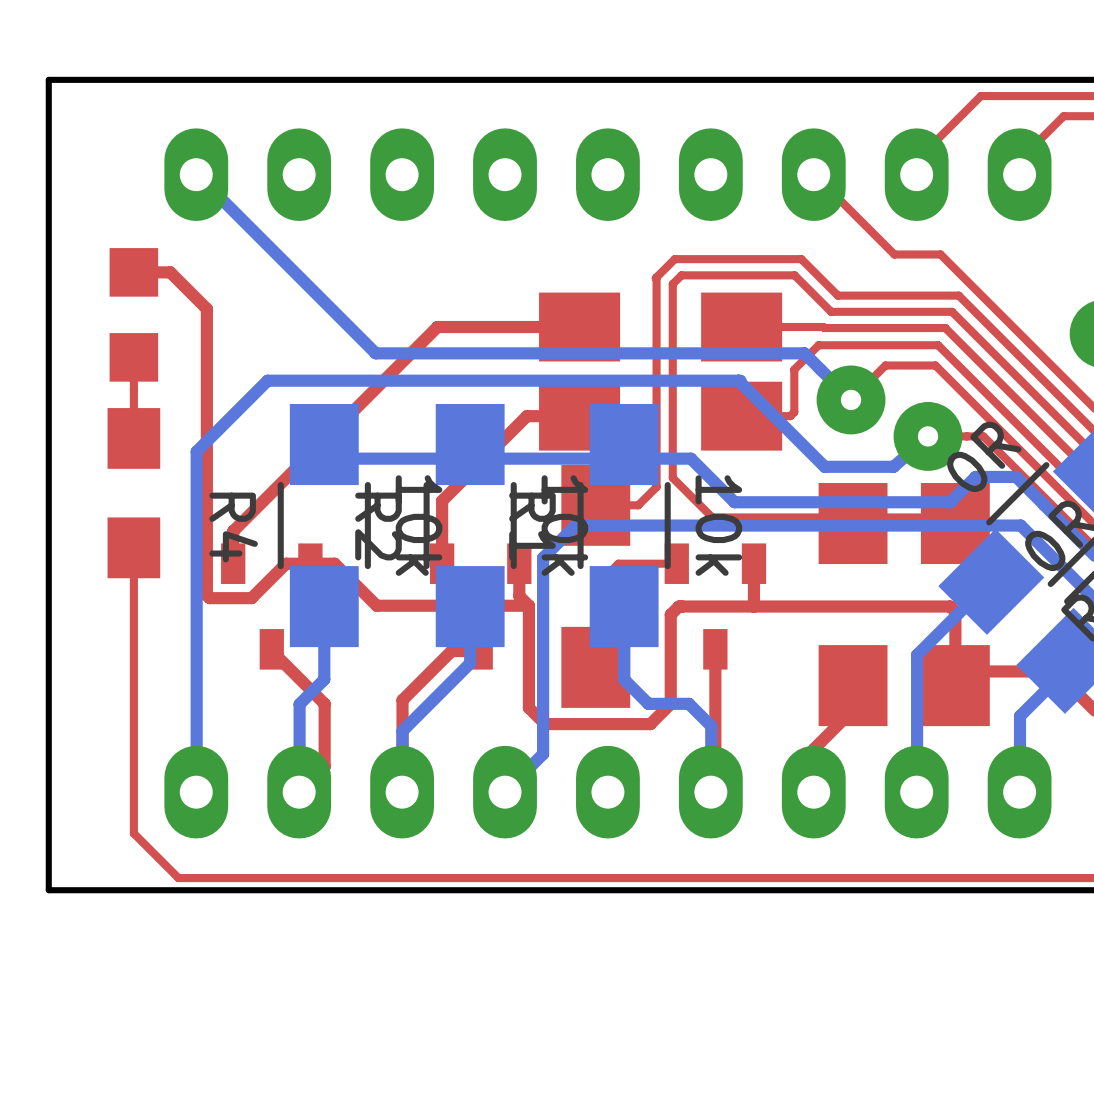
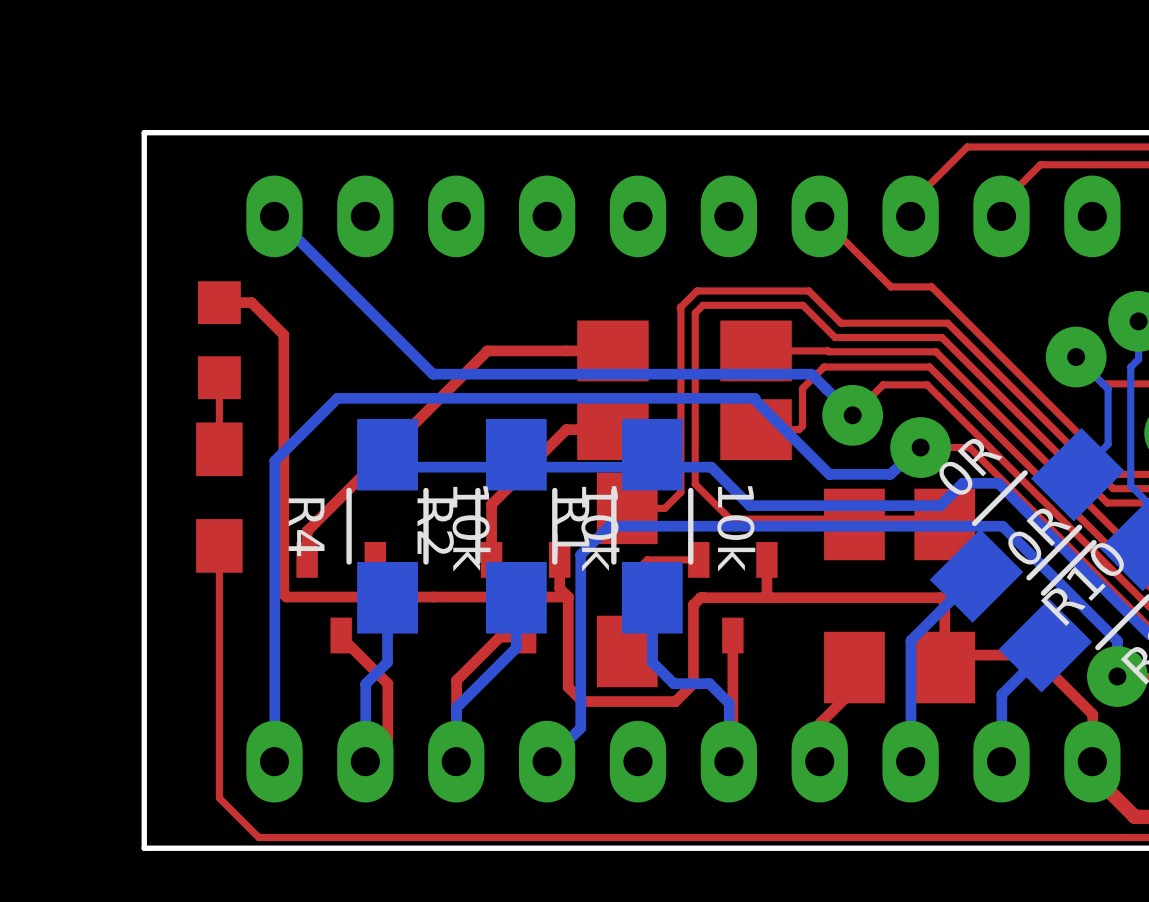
top track: (206, 595) (209, 598) (251, 598) (286, 563) (334, 563) (376, 605) -> (283, 587) (283, 594) (286, 597) (433, 597)

